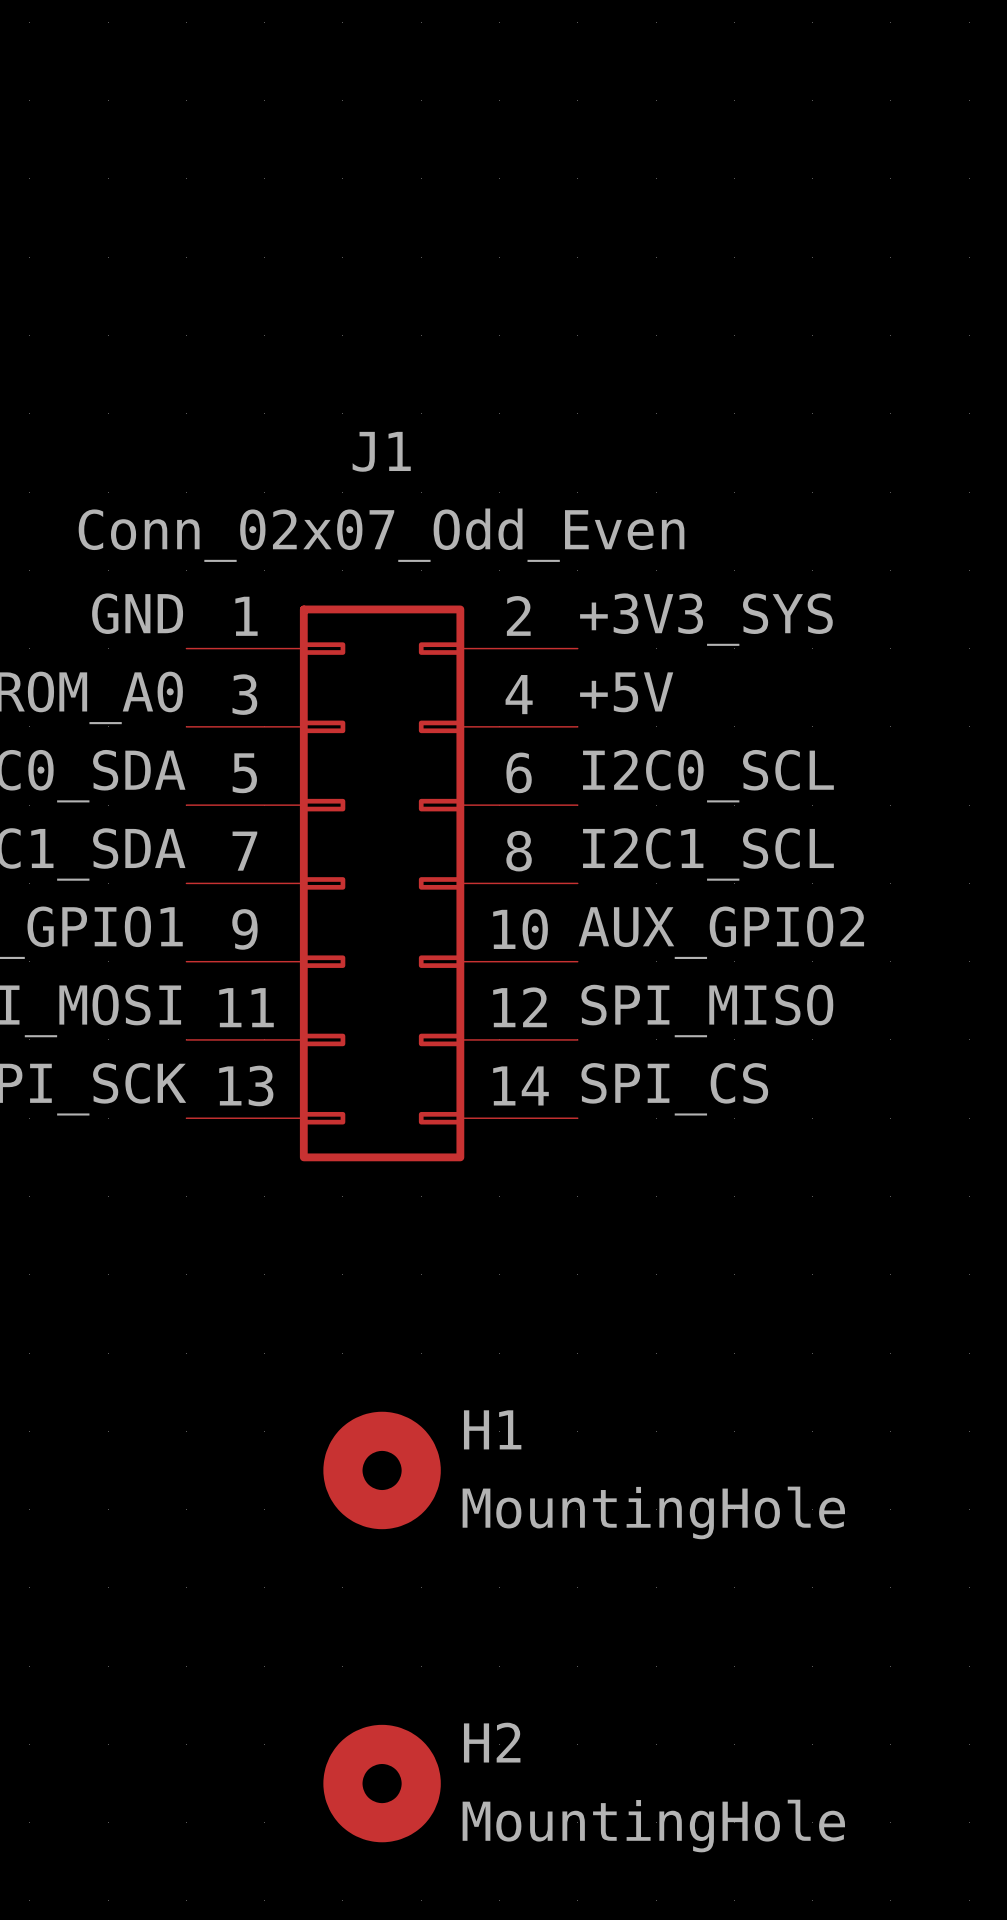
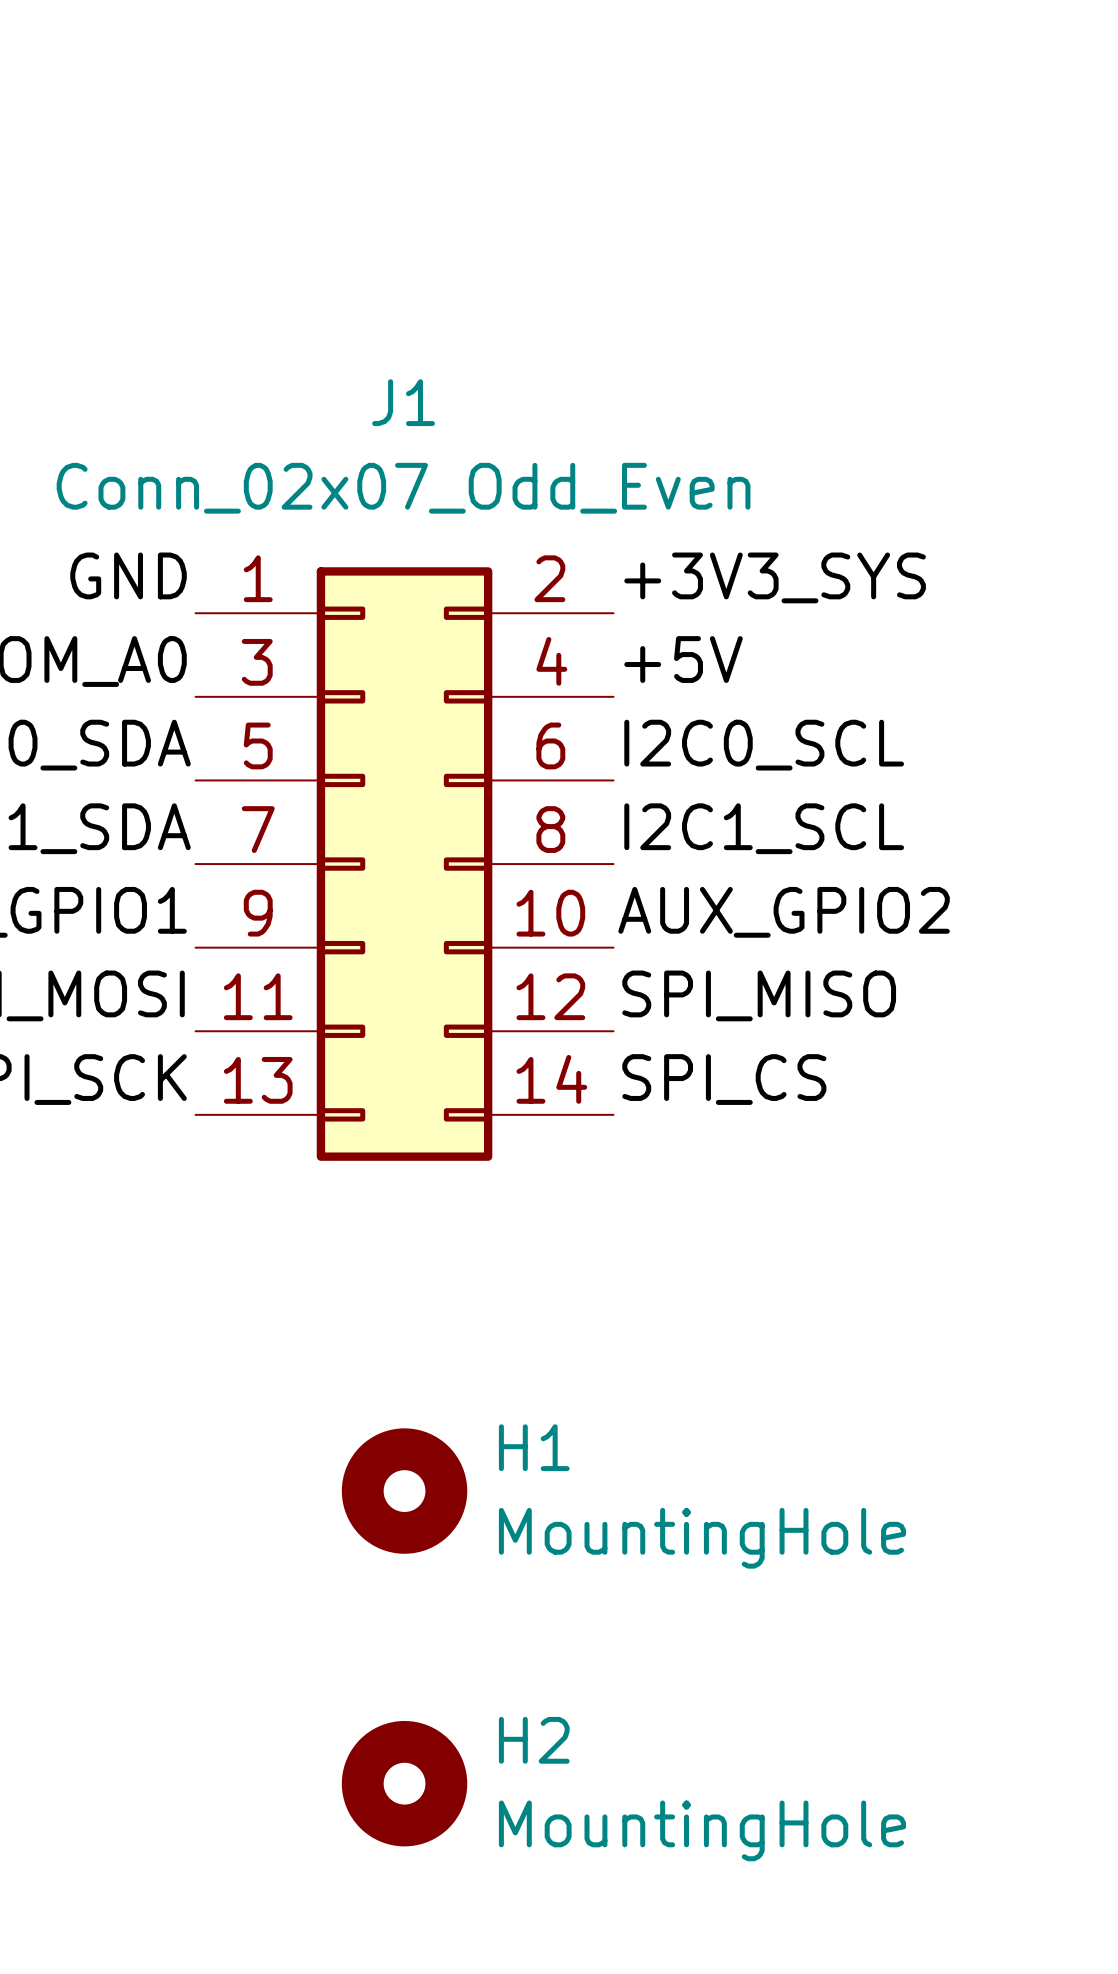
H2 position: (382, 1783) -> (404, 1783)

